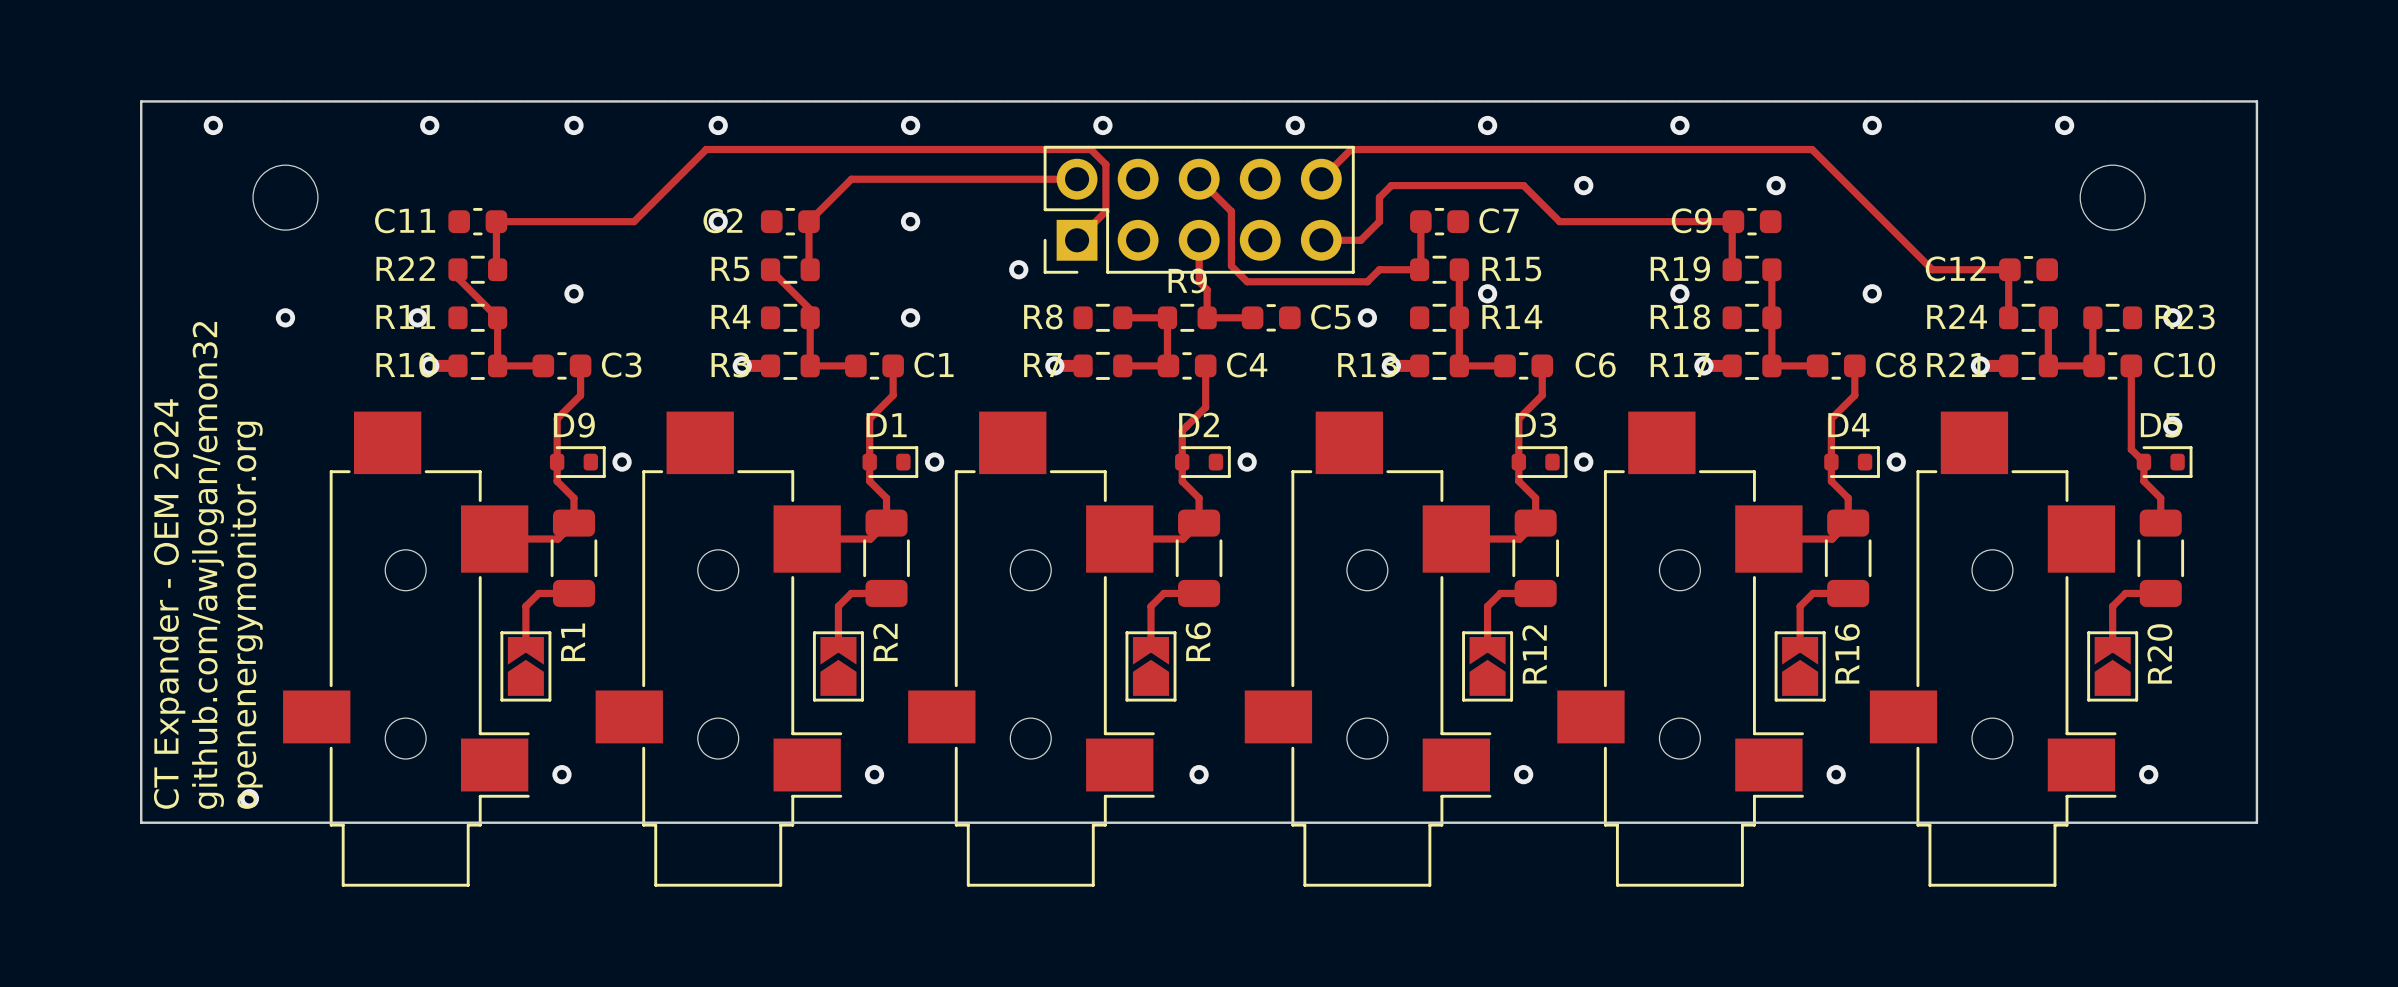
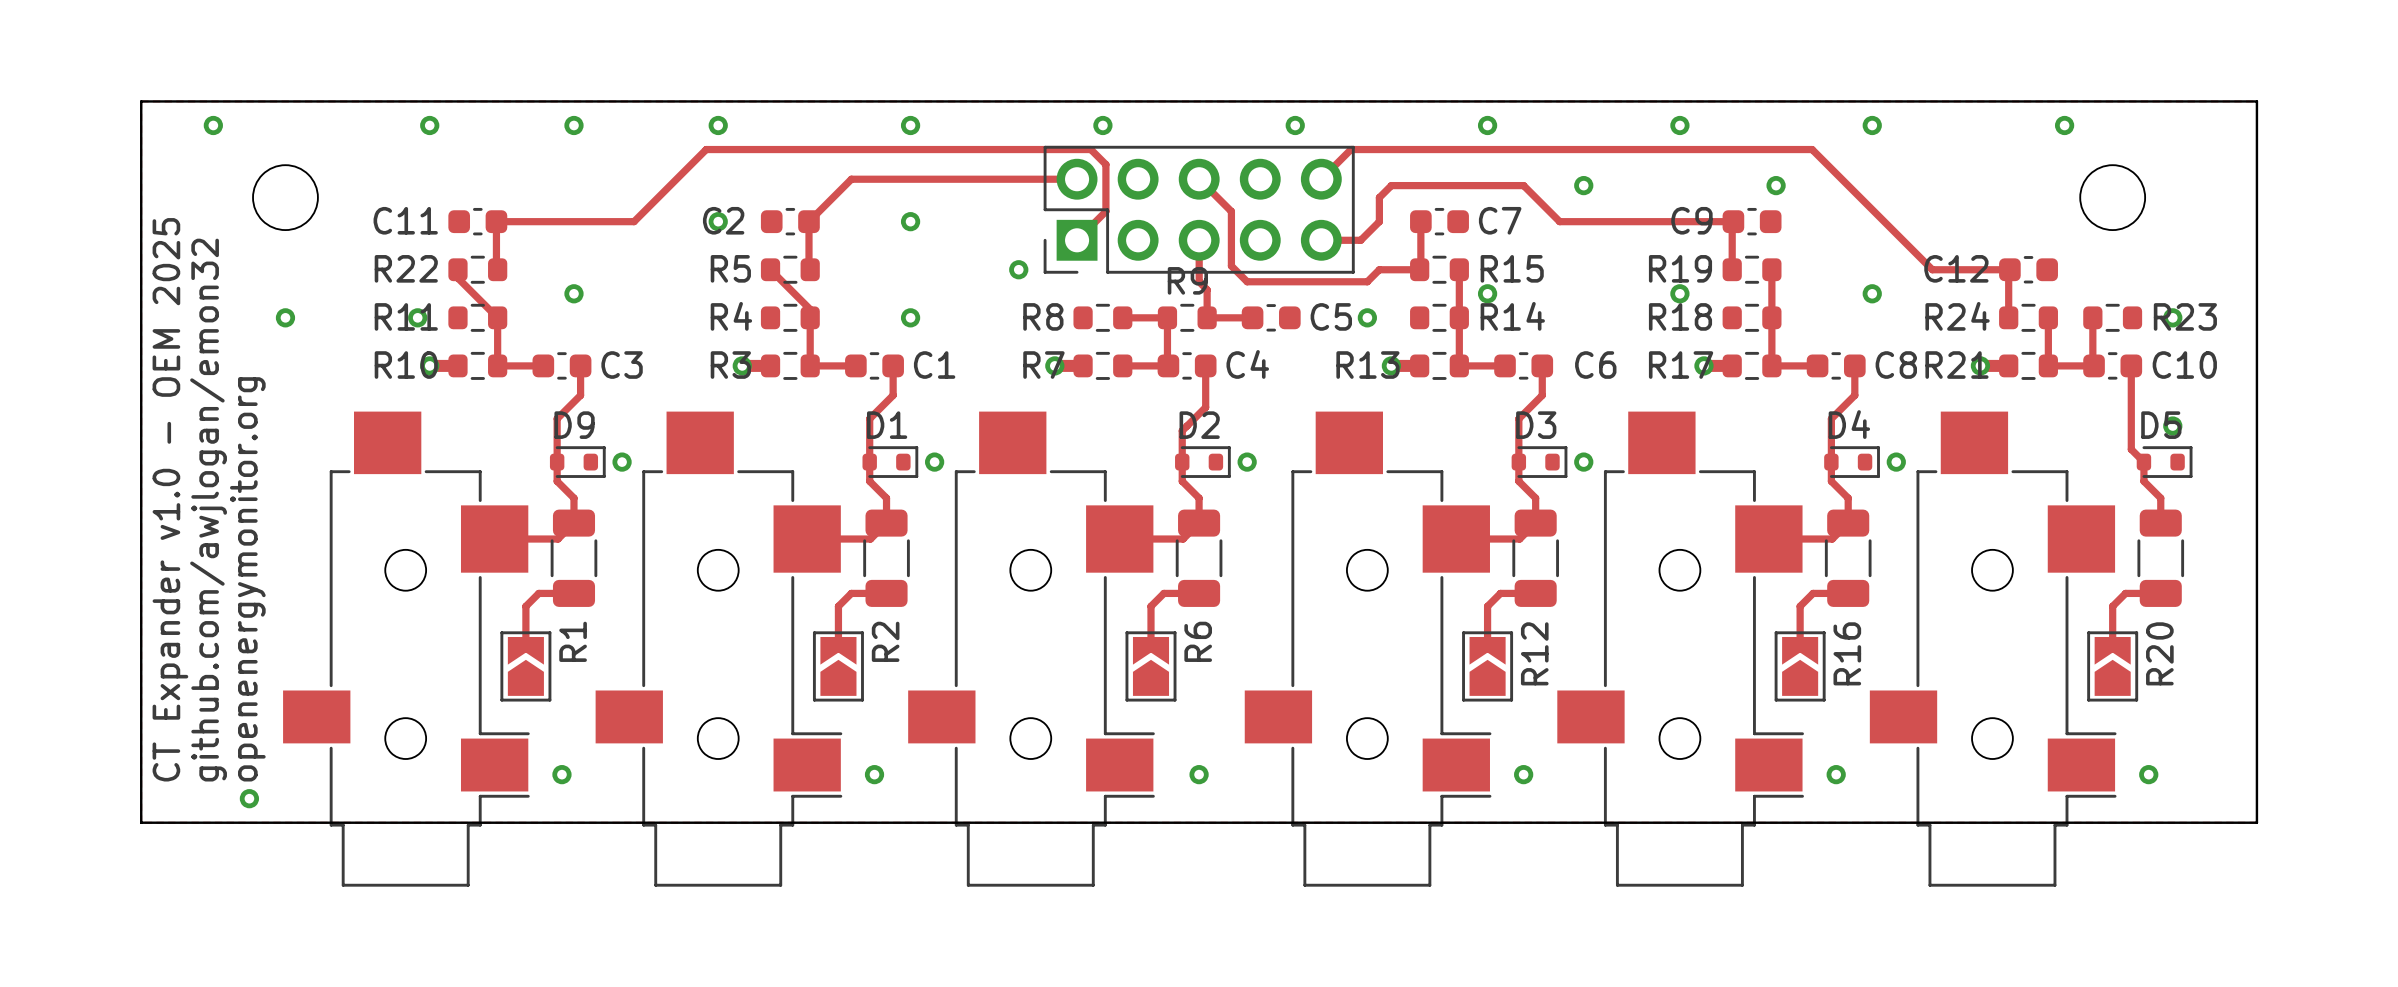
text position: github.com/awjlogan/emon32 (208, 565) -> github.com/awjlogan/emon32 (208, 510)
text: CT Expander - OEM 2024 (169, 604) -> CT Expander v1.0 - OEM 2025 (170, 499)
text position: openenergymonitor.org (246, 615) -> openenergymonitor.org (247, 579)

